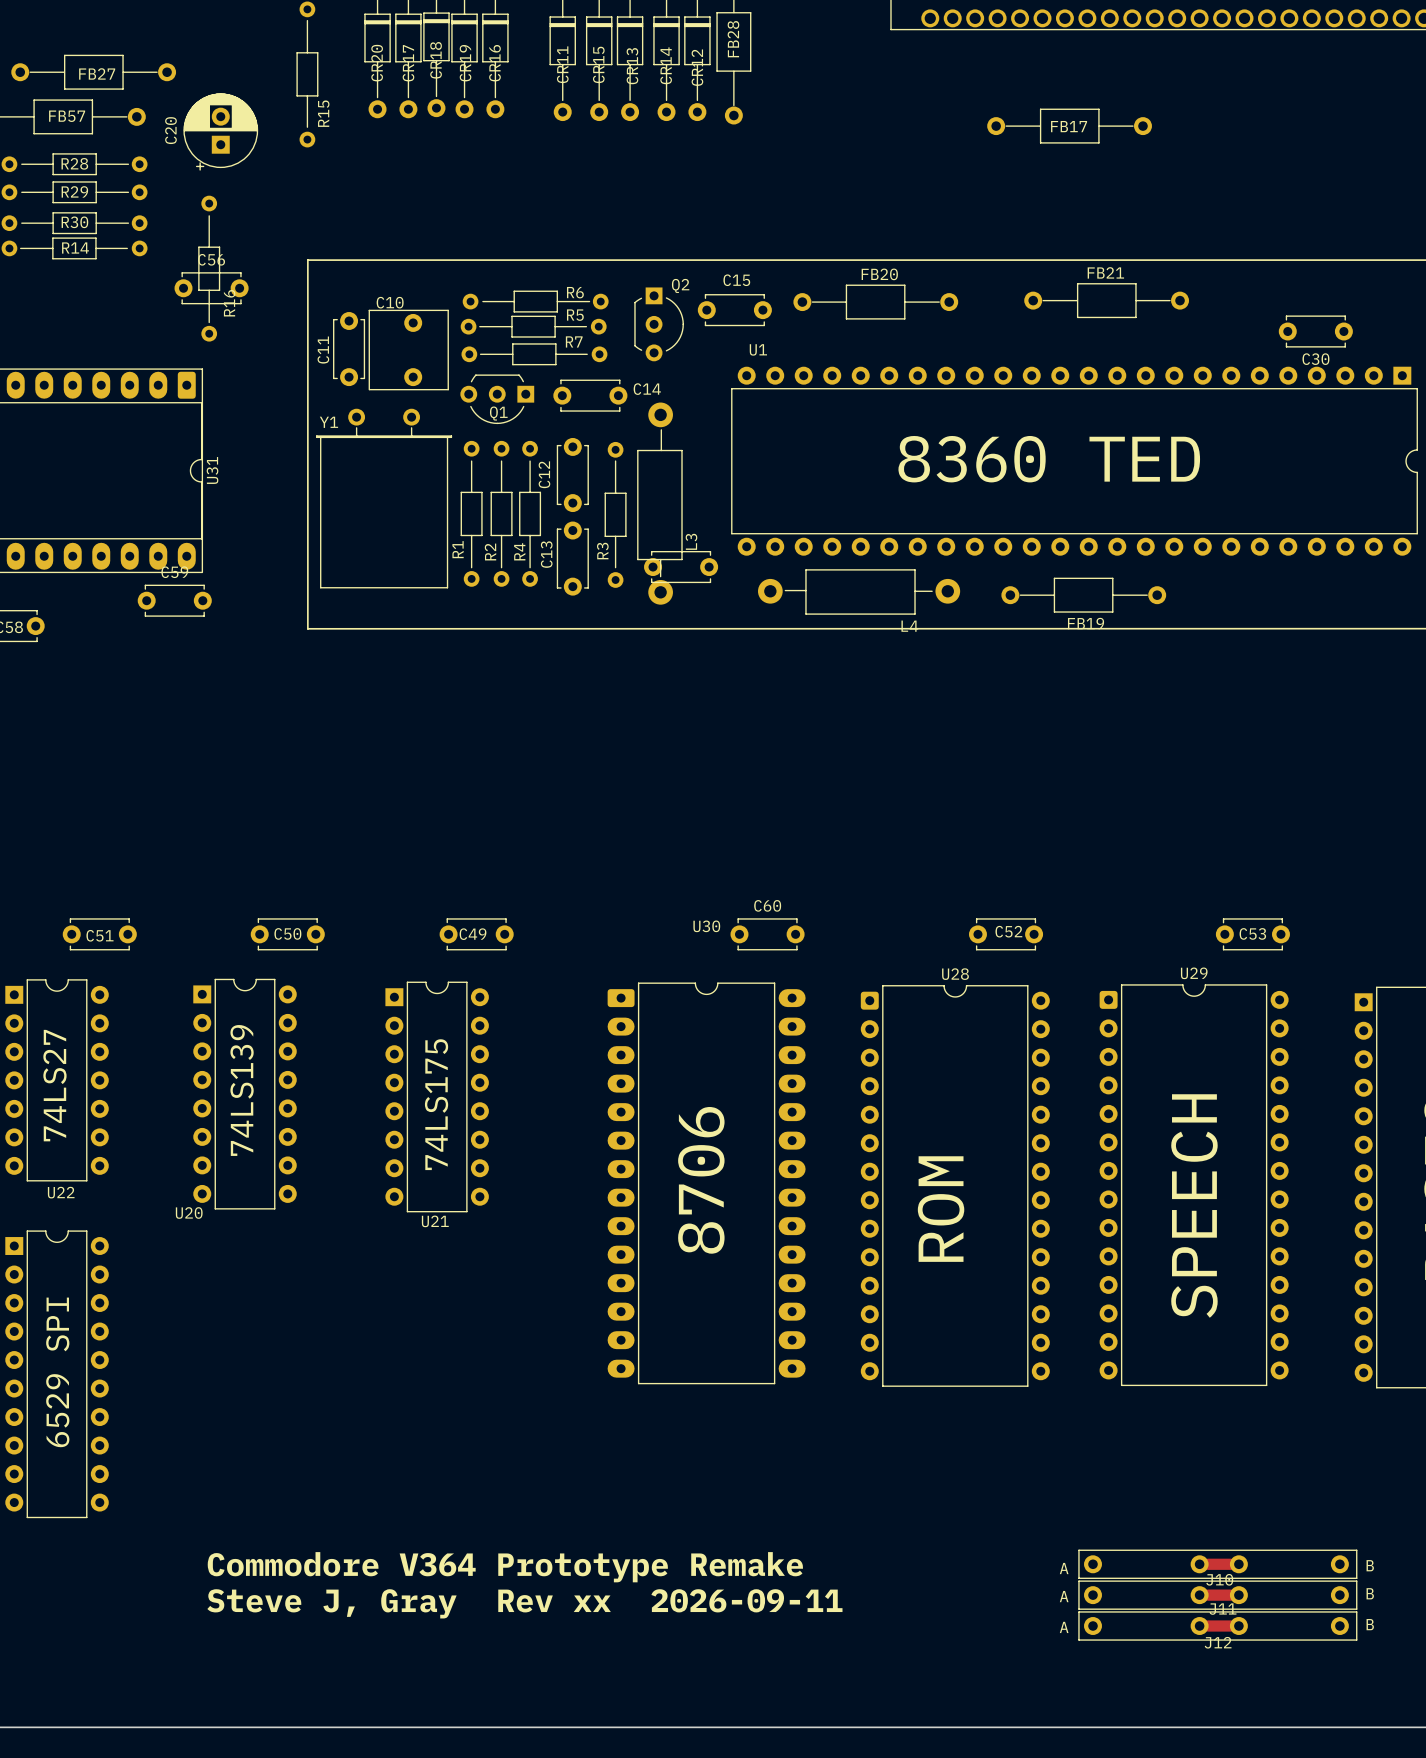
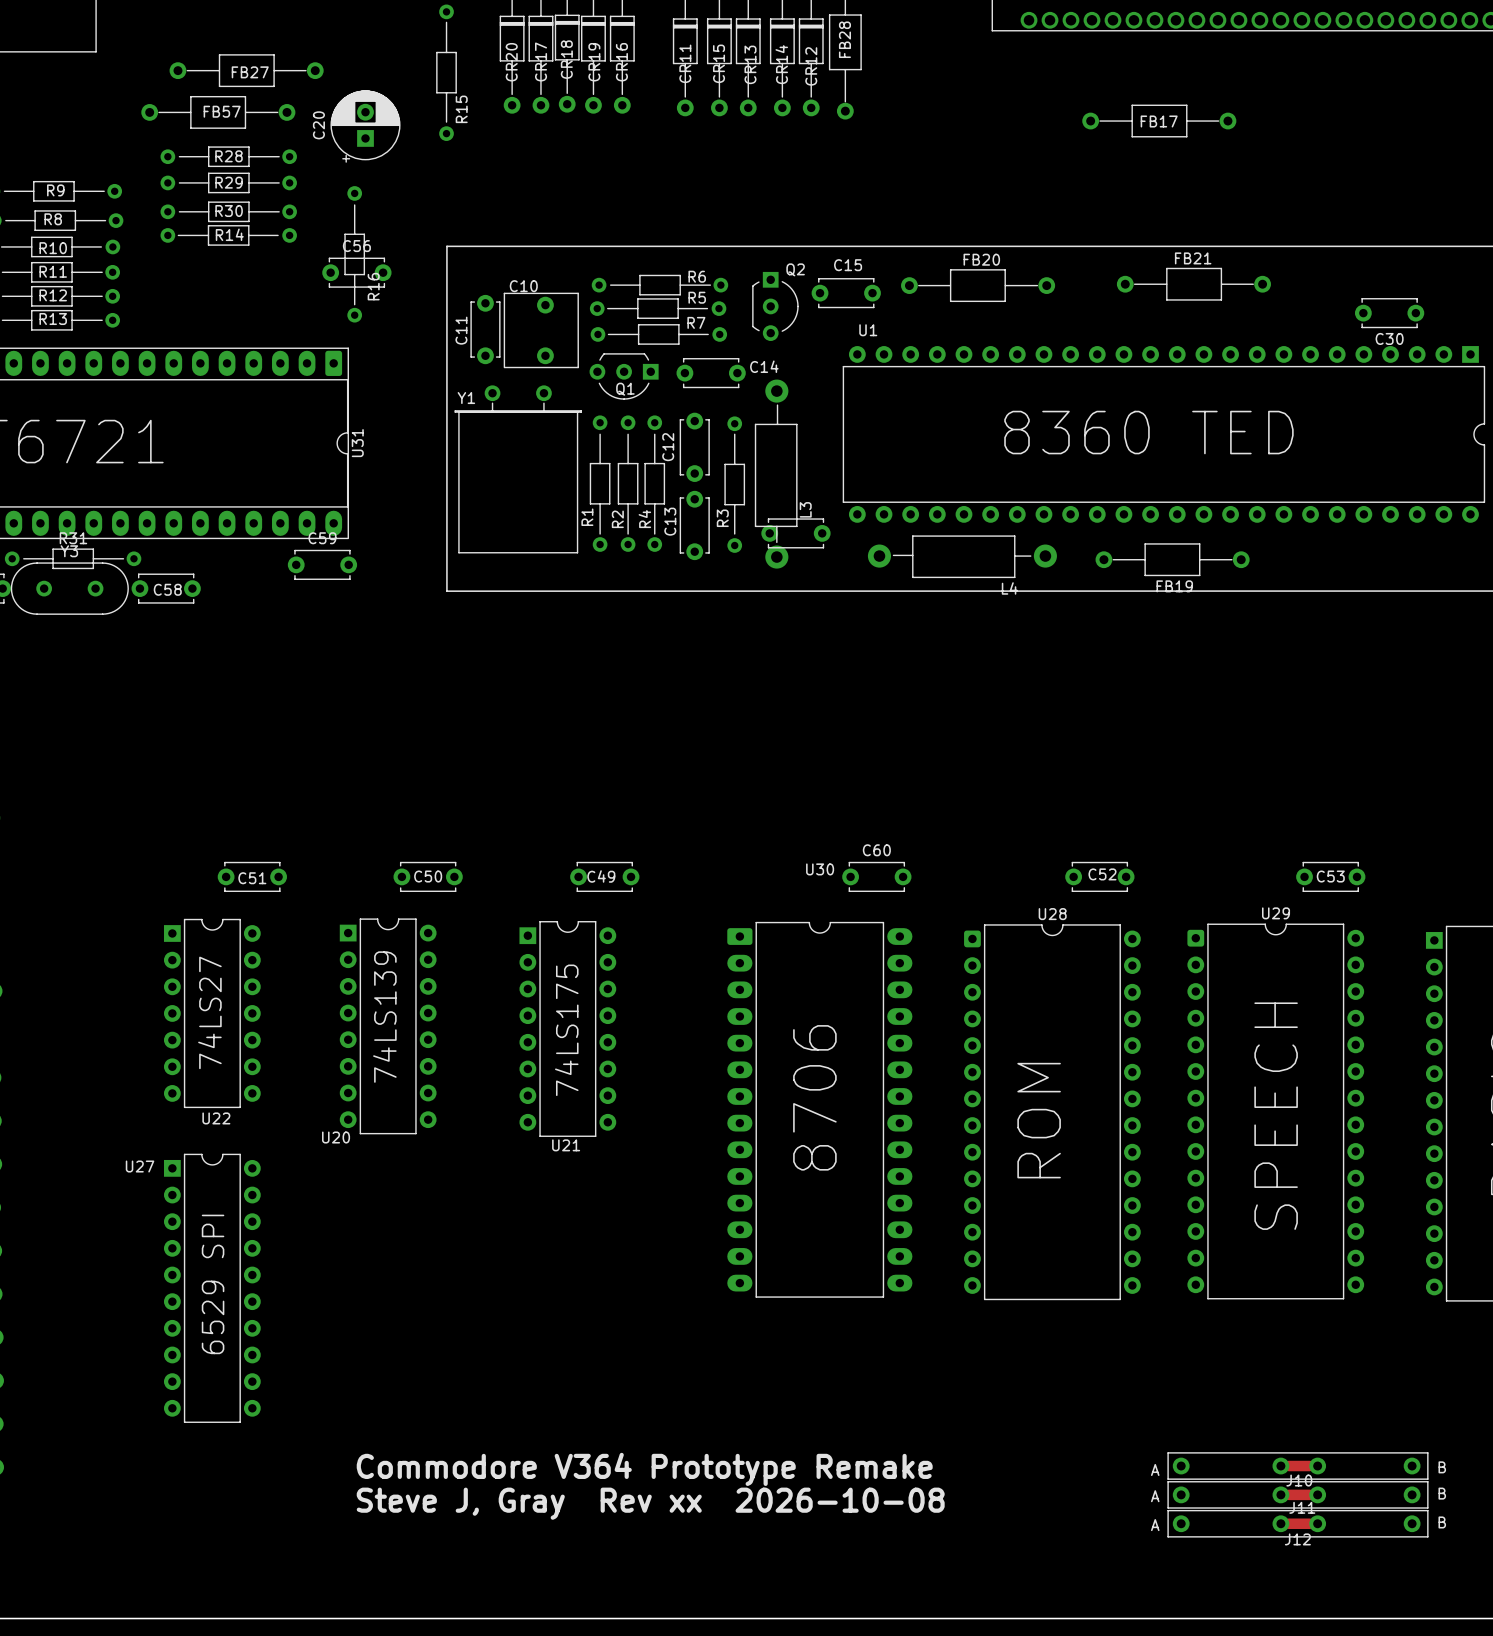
text: Steve J, Gray Rev xx 2026-09-11 (524, 1603) -> Steve J, Gray Rev xx 2026-10-08 (650, 1503)

